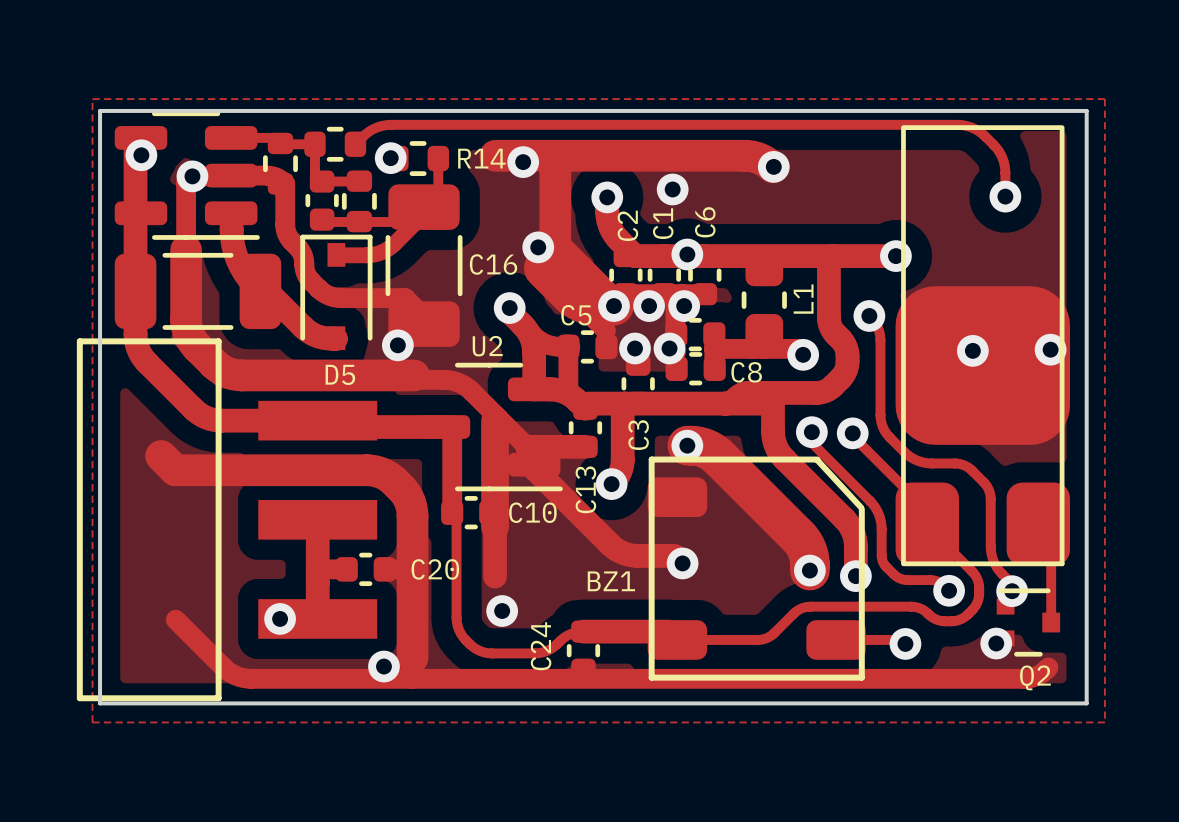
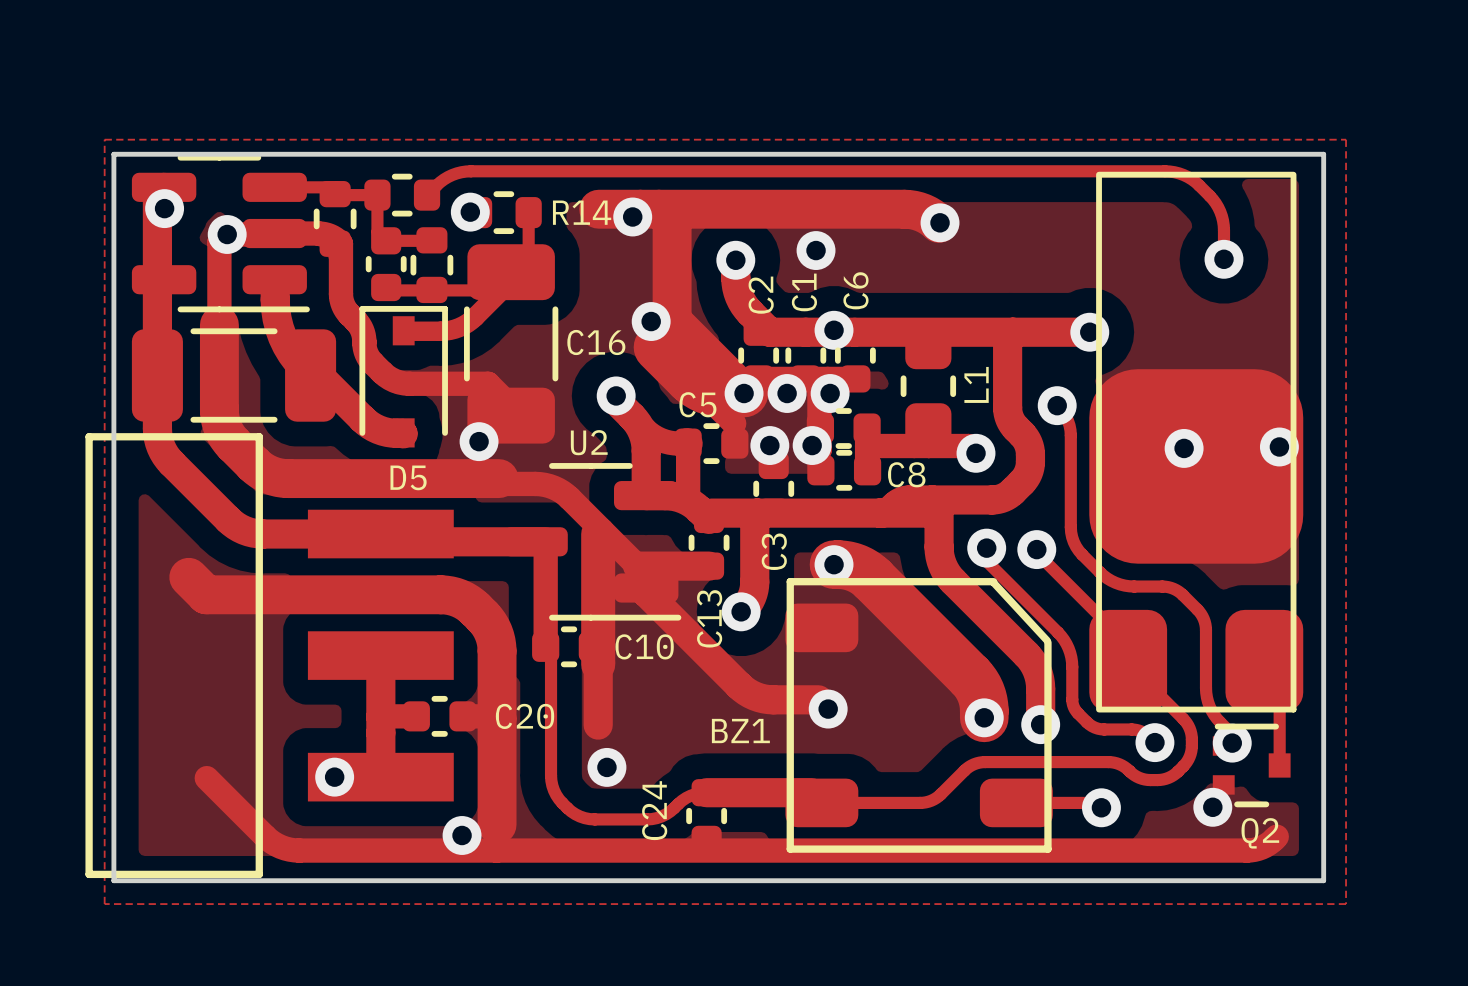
track: (1051, 537) (1051, 622) -> (1279, 676) (1279, 765)
Q2 position: (1028, 622) -> (1251, 765)

